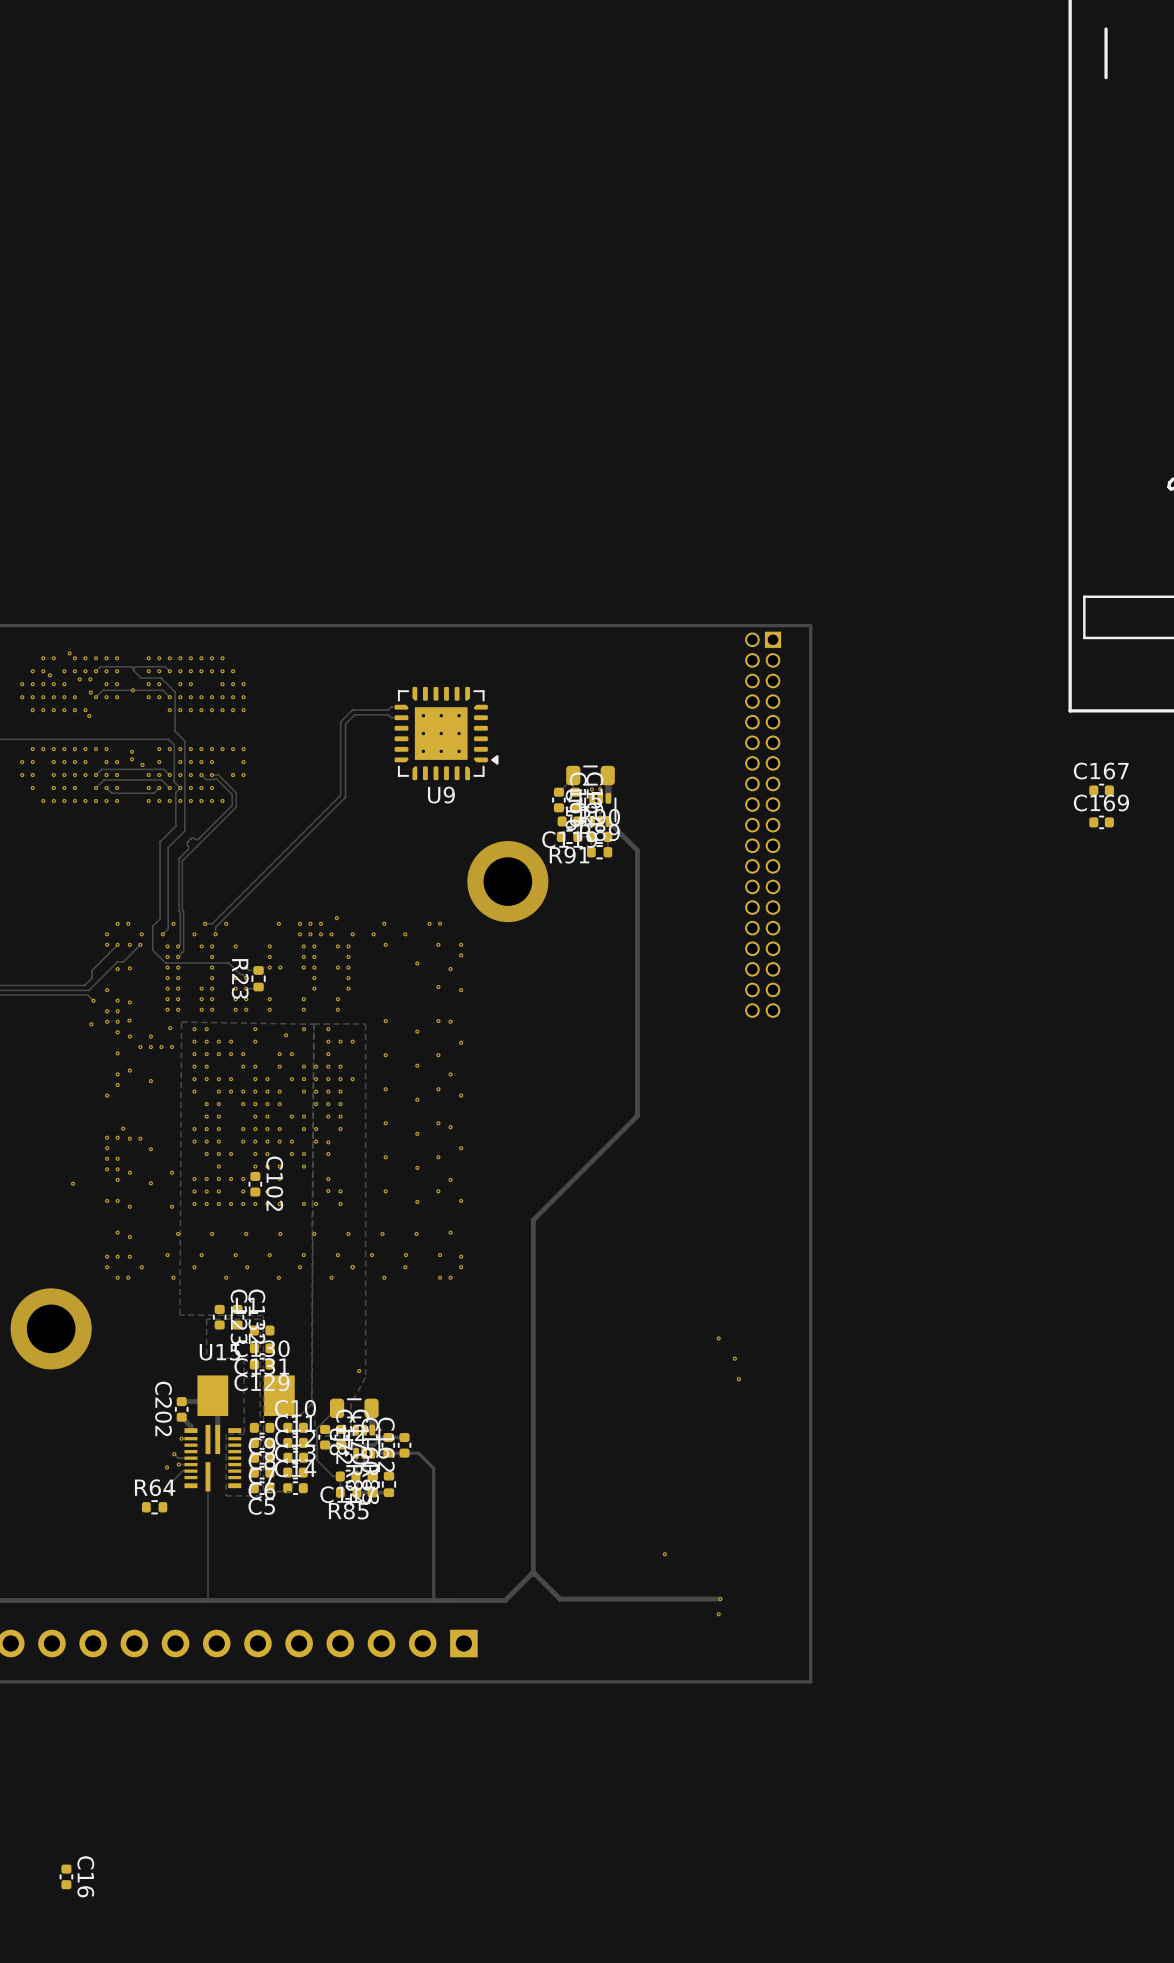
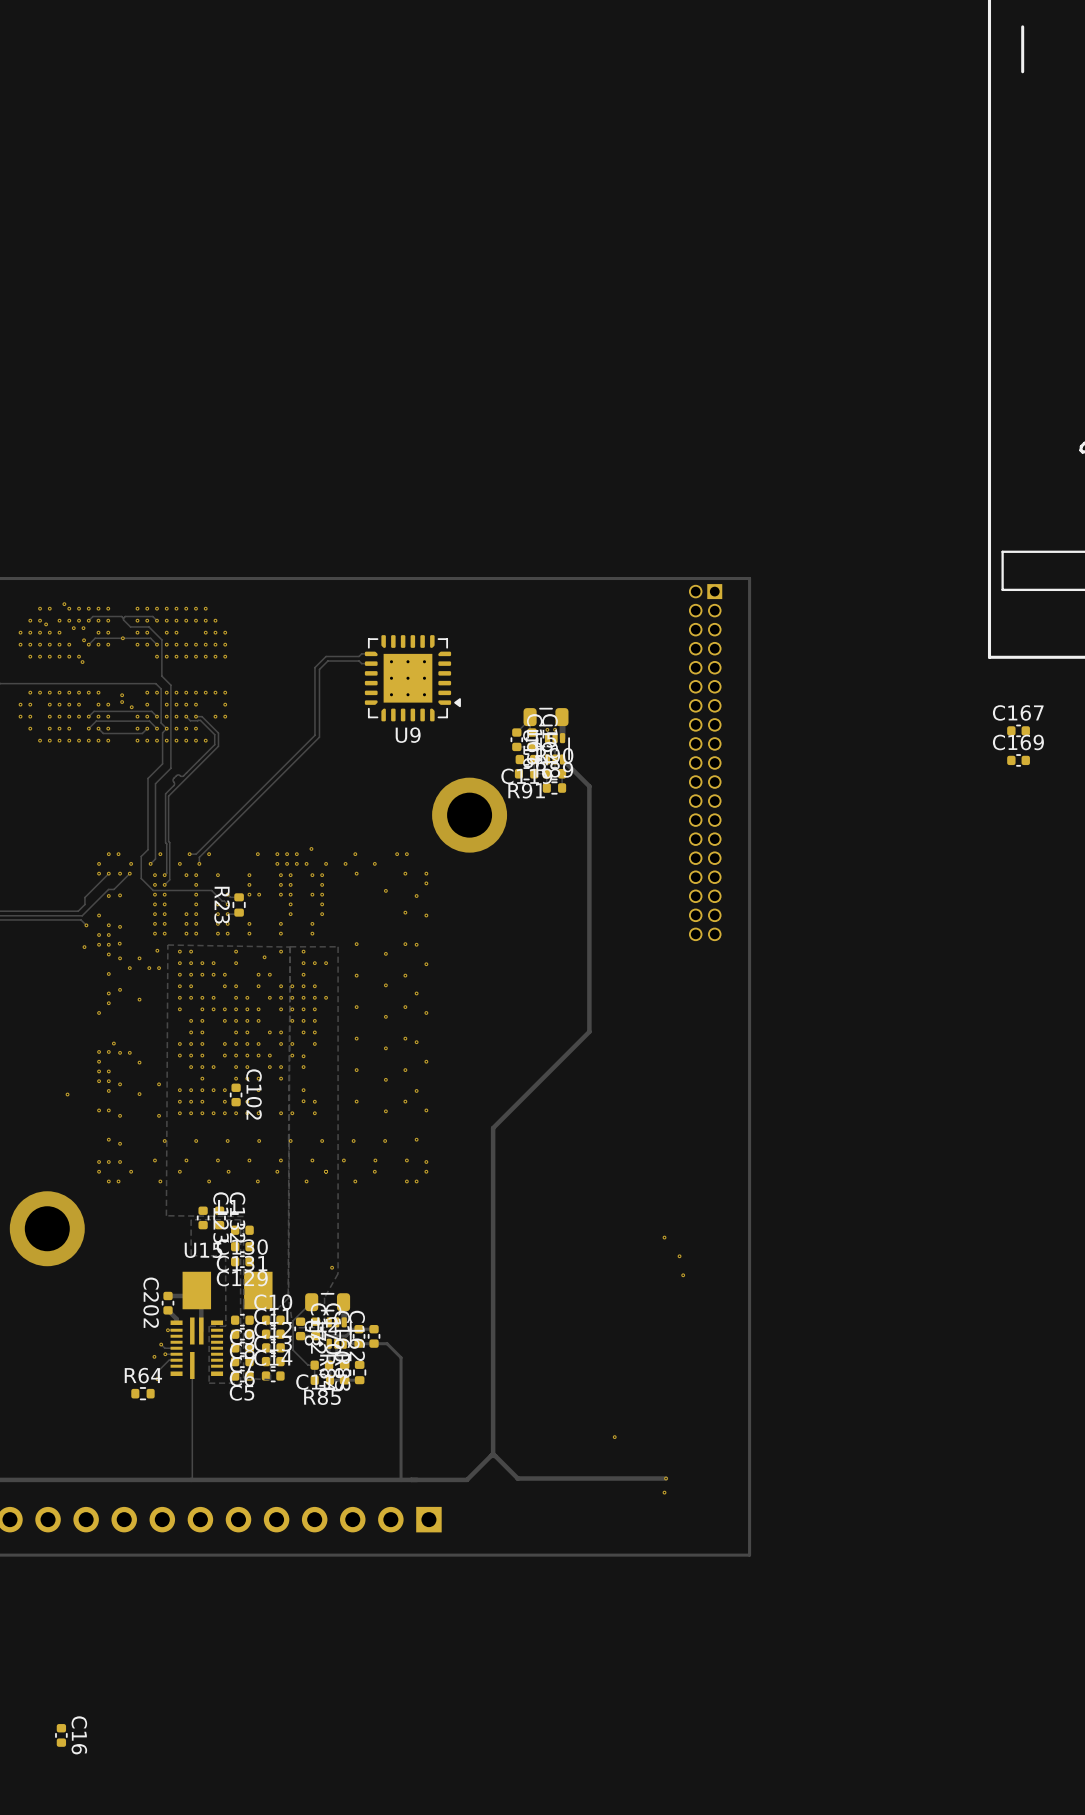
via: (150, 1047) -> none

